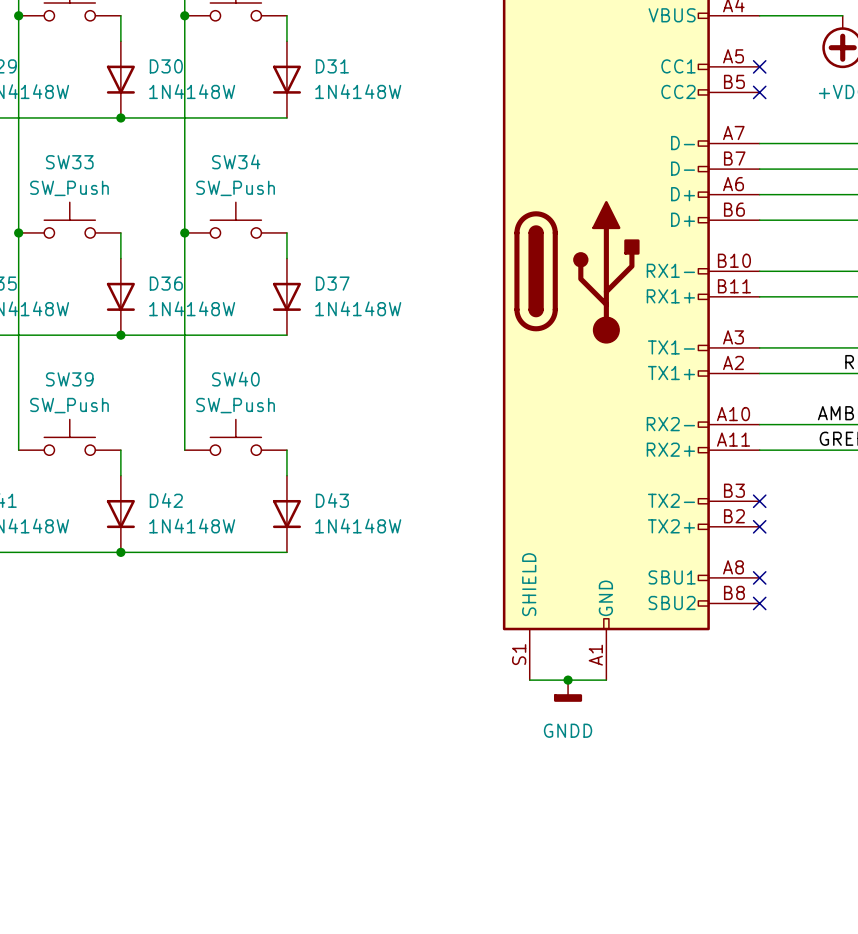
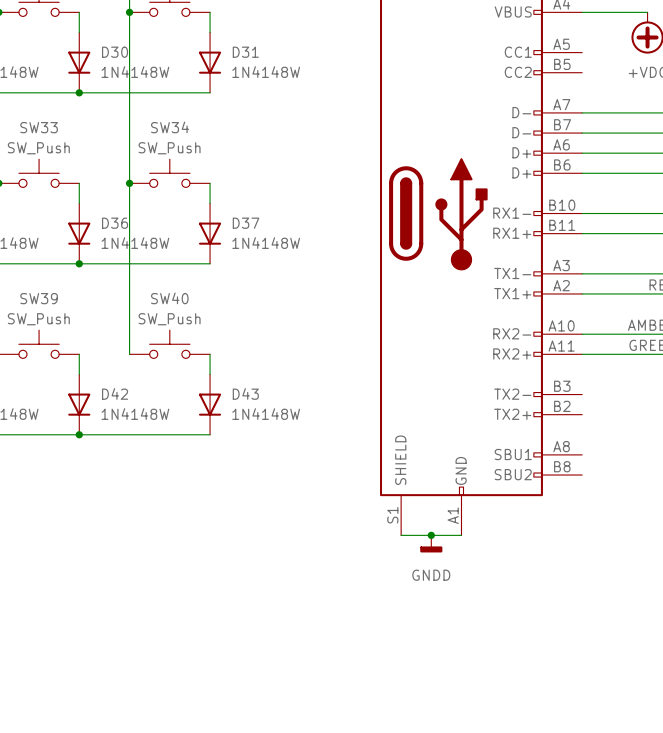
no-connect mark: (759, 66) -> none
no-connect mark: (759, 92) -> none
no-connect mark: (759, 501) -> none
no-connect mark: (759, 526) -> none
no-connect mark: (759, 577) -> none
no-connect mark: (759, 603) -> none

